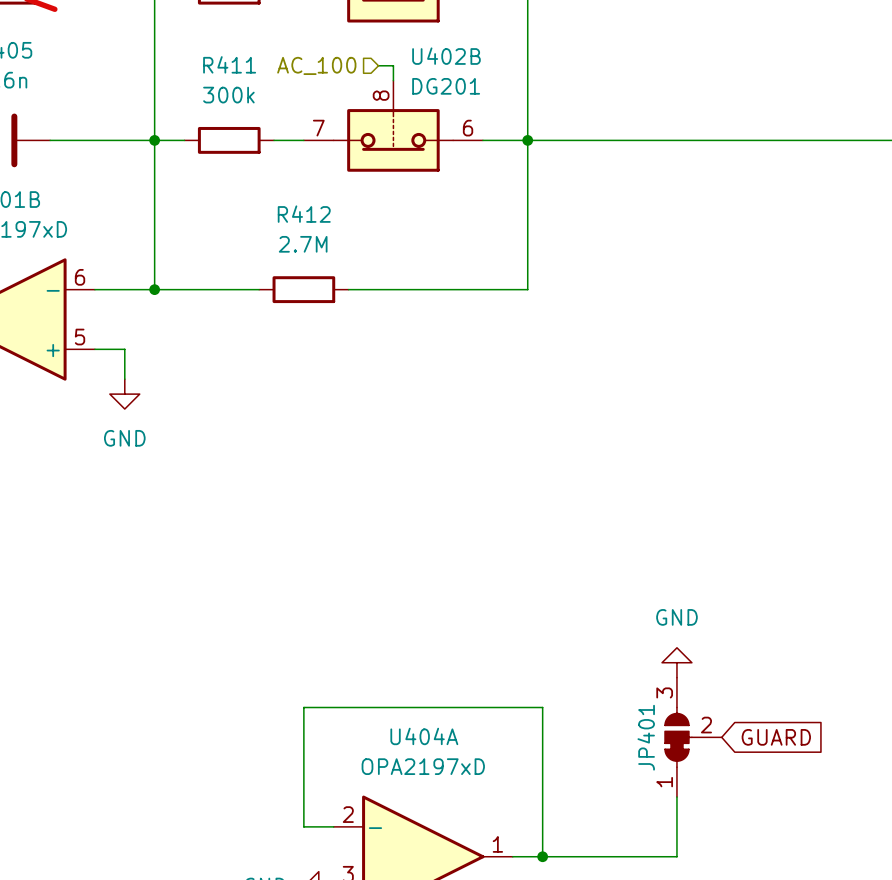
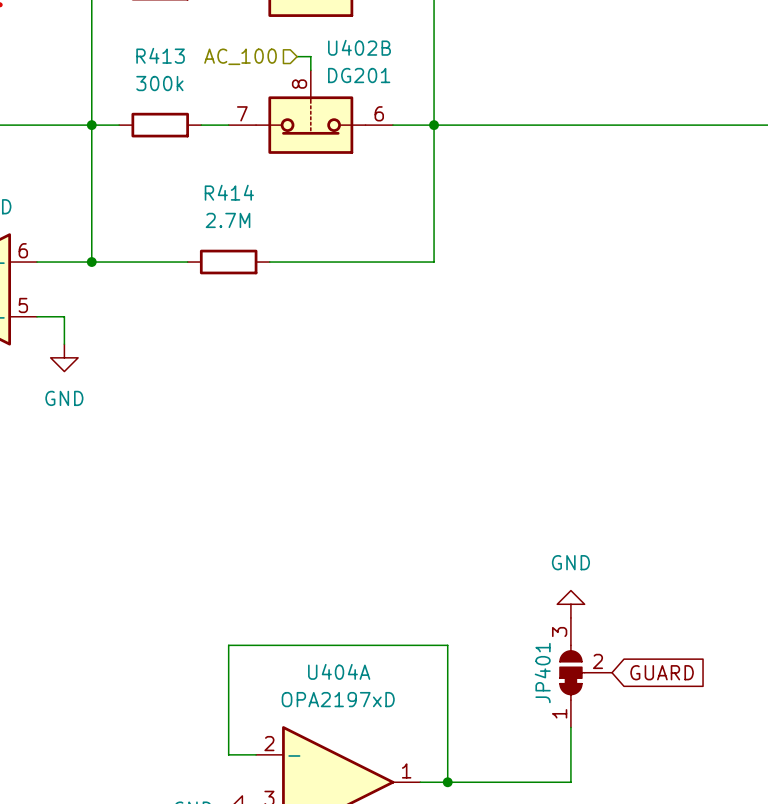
R411 name: R411 (229, 64) -> R413 (160, 55)
R412 name: R412 (304, 214) -> R414 (229, 192)

